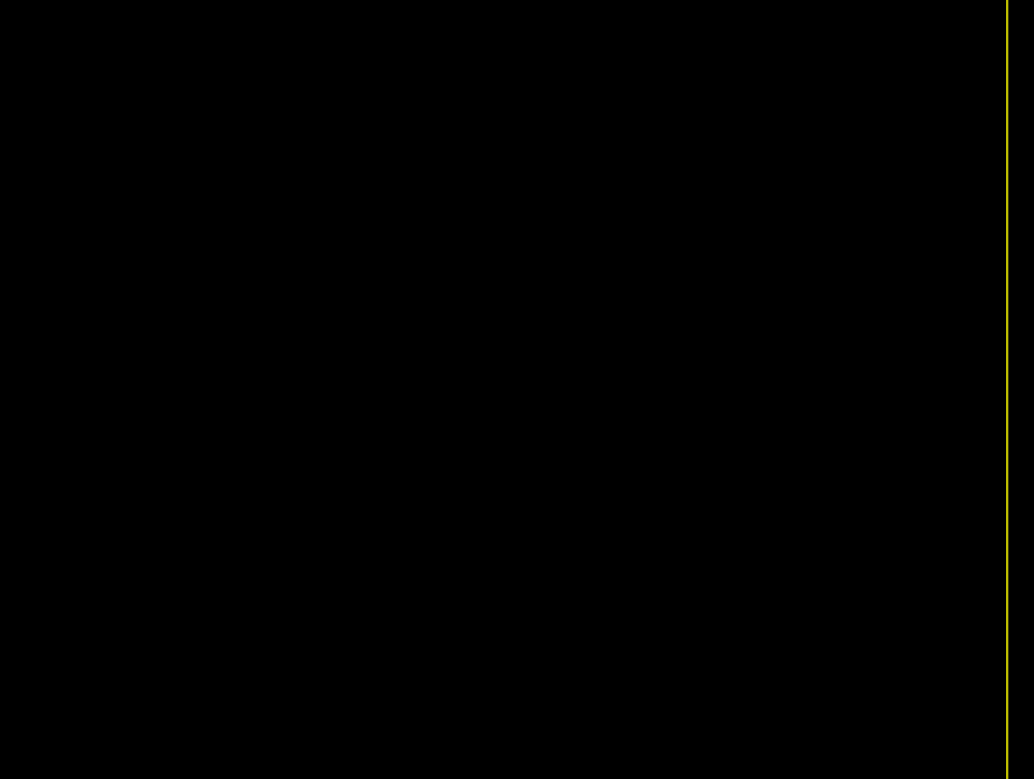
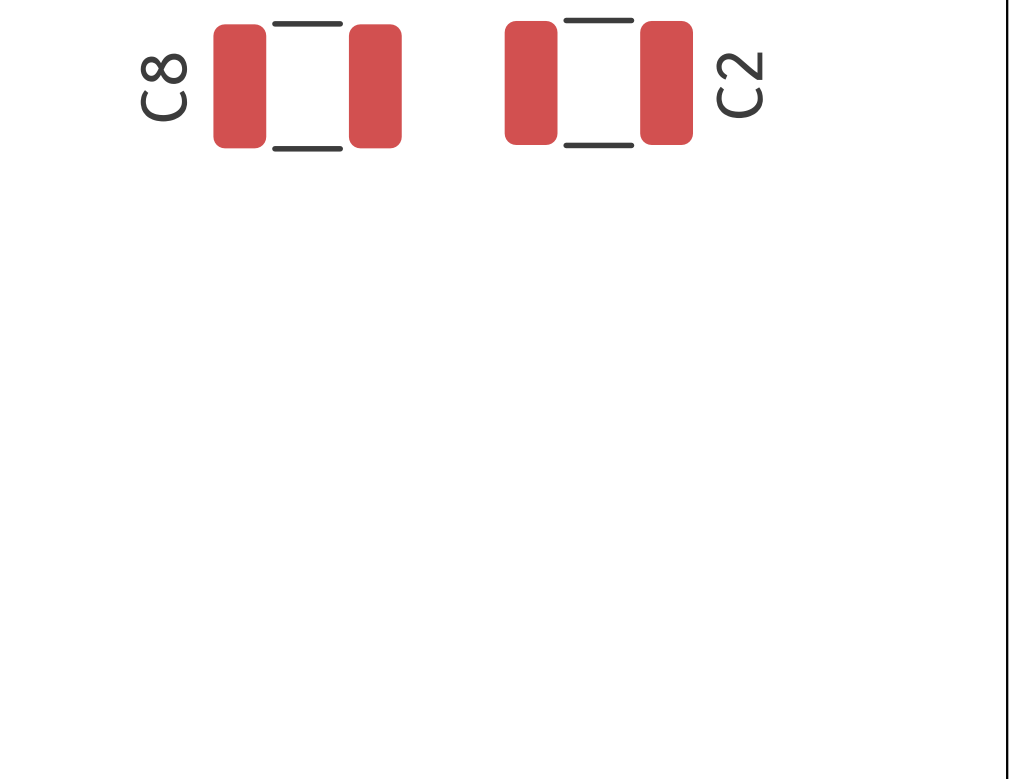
C2: none -> (598, 82)
C8: none -> (307, 86)

